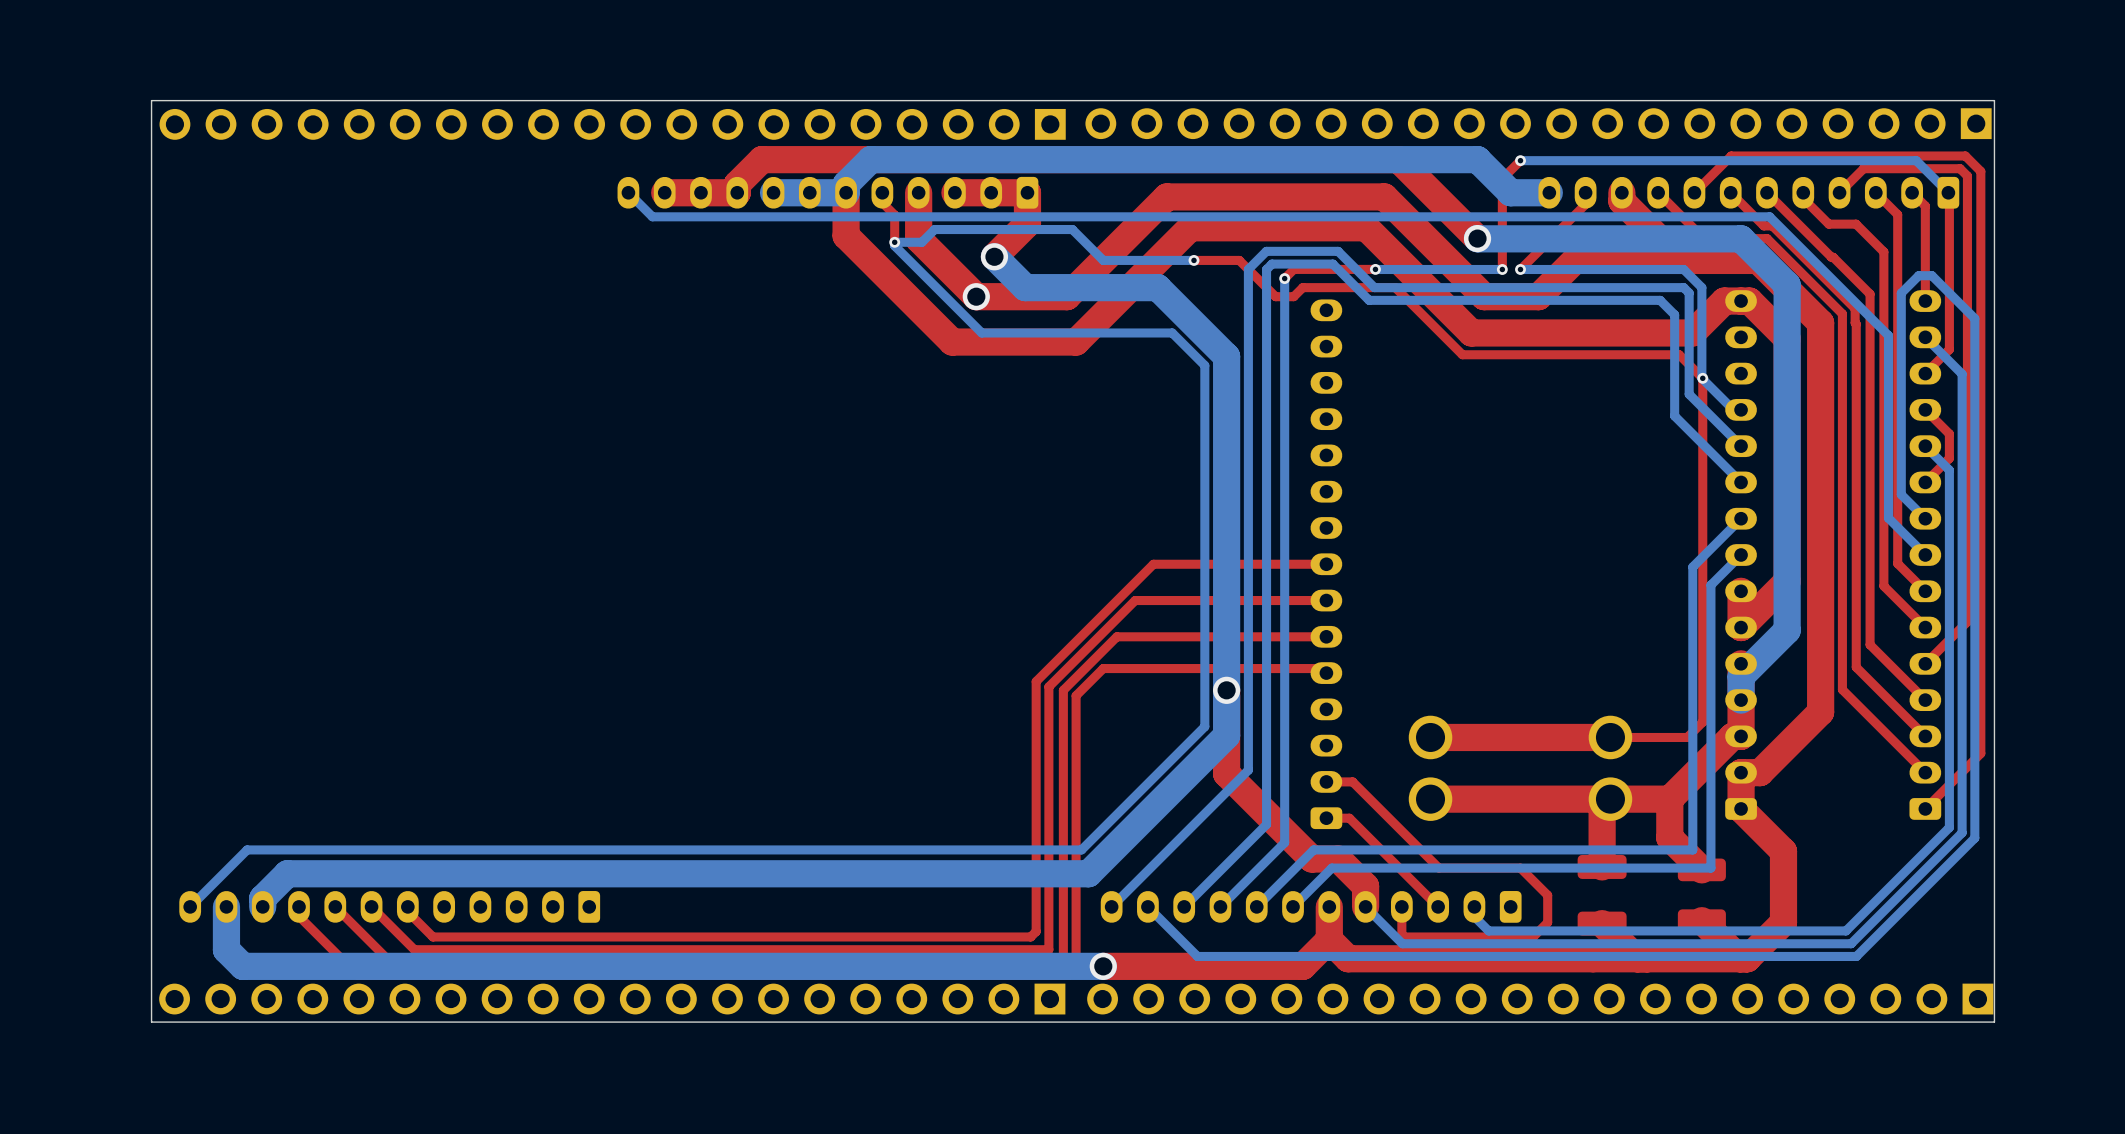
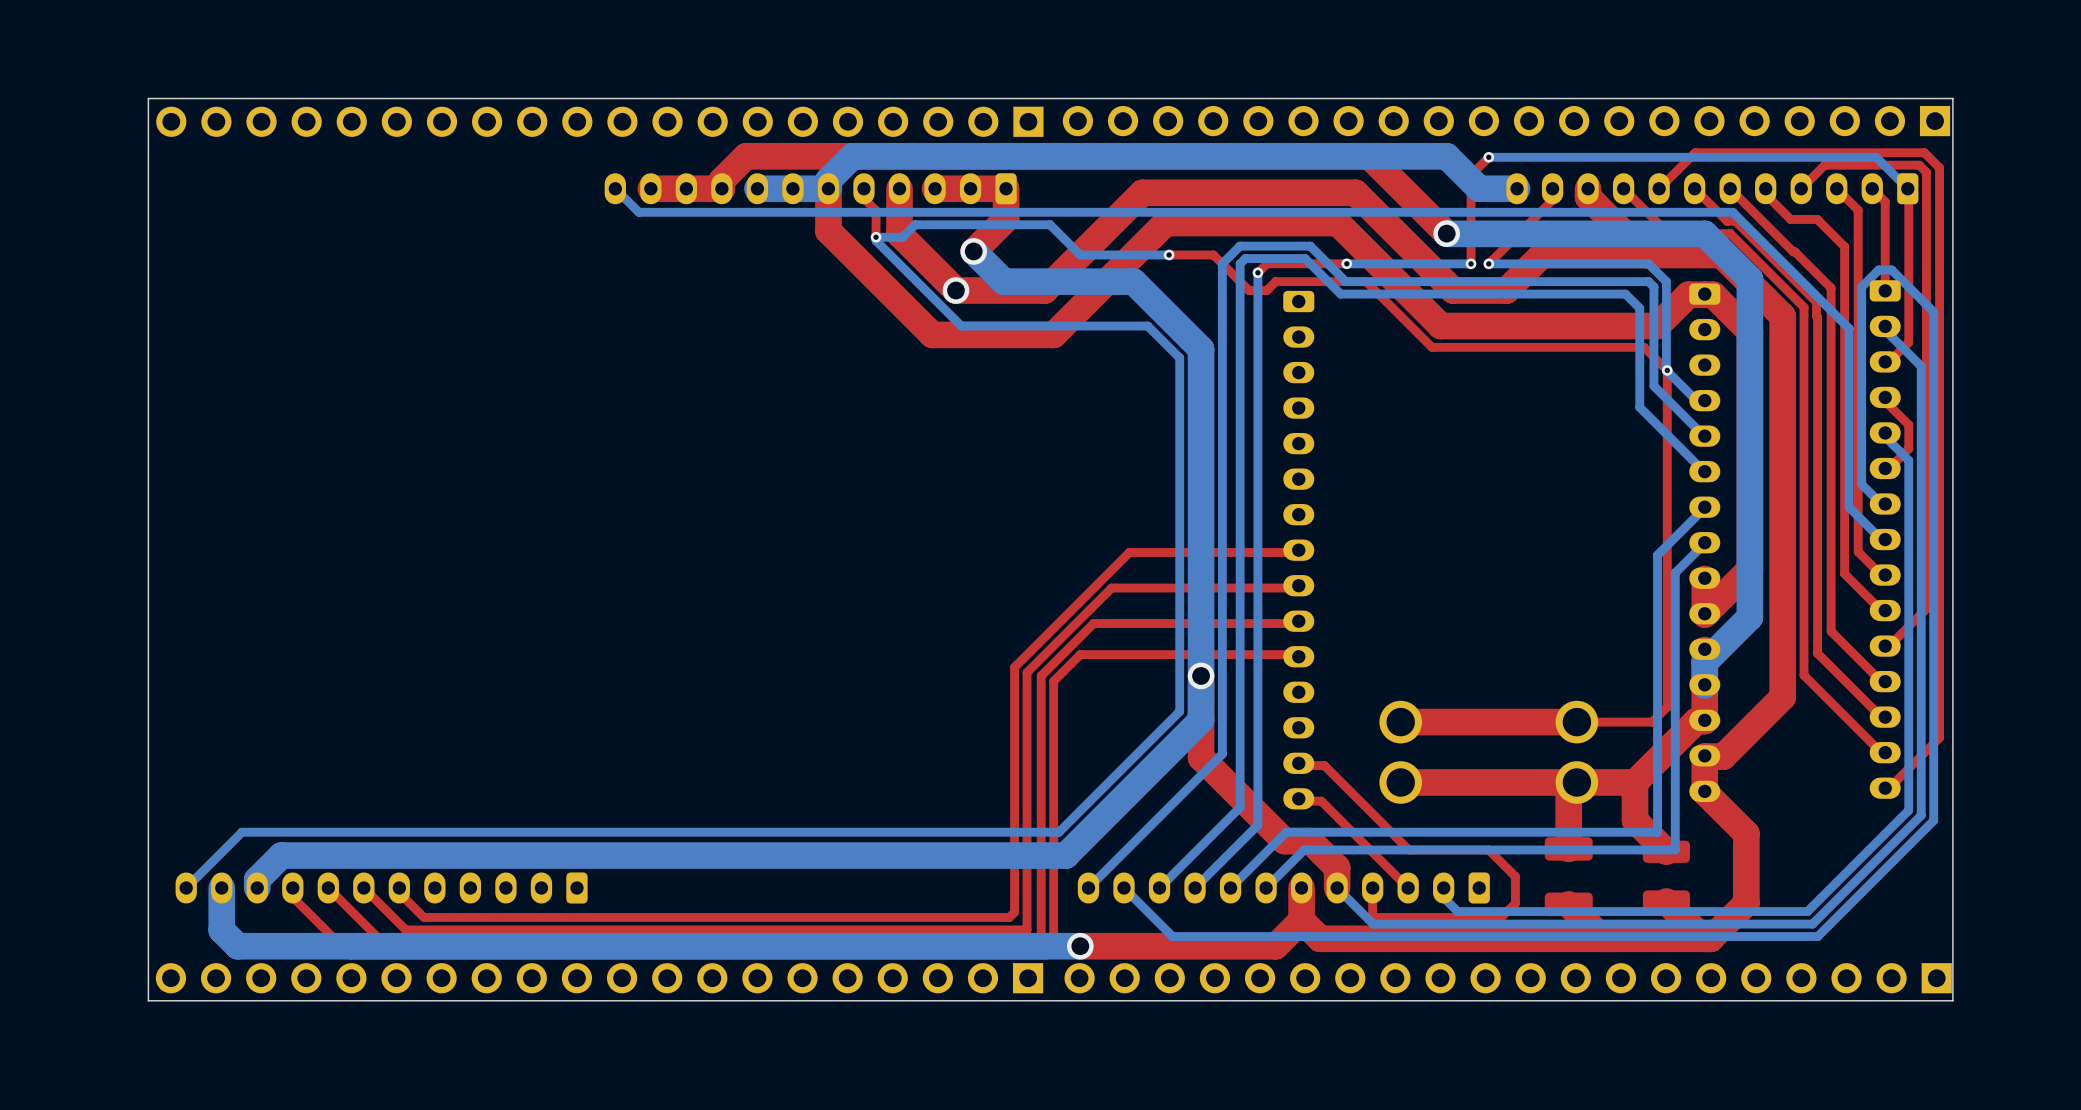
part rotation: 0° (1741, 555) -> 180° (1704, 542)
part rotation: 0° (1925, 555) -> 180° (1885, 539)
part rotation: 0° (1326, 564) -> 180° (1298, 550)

